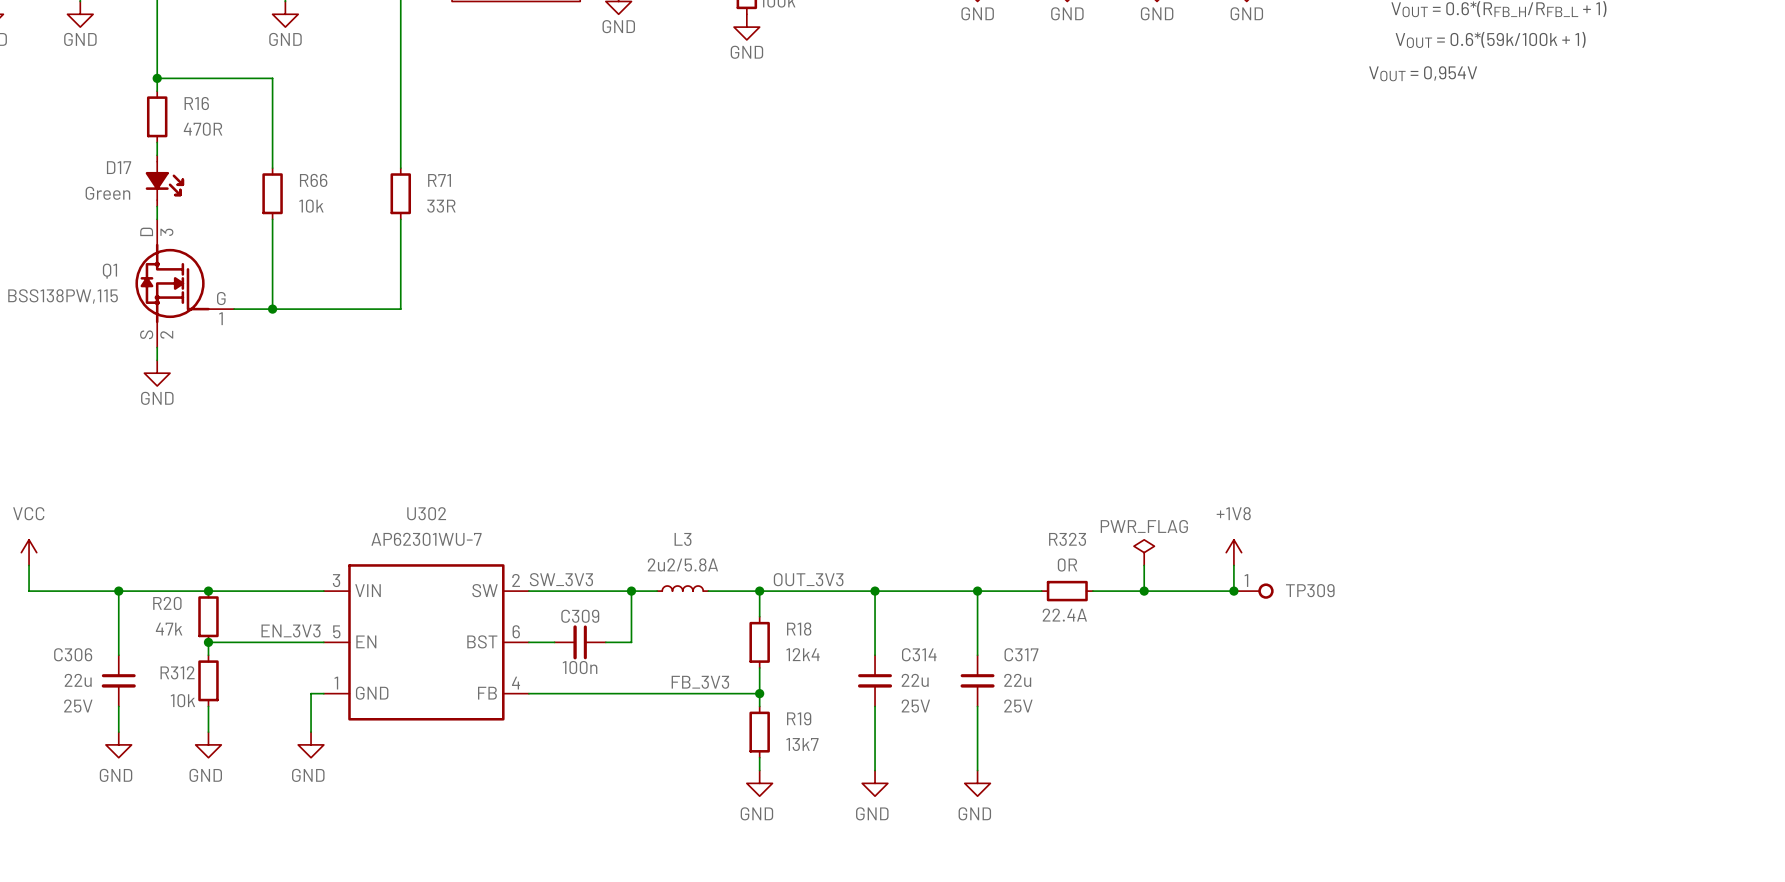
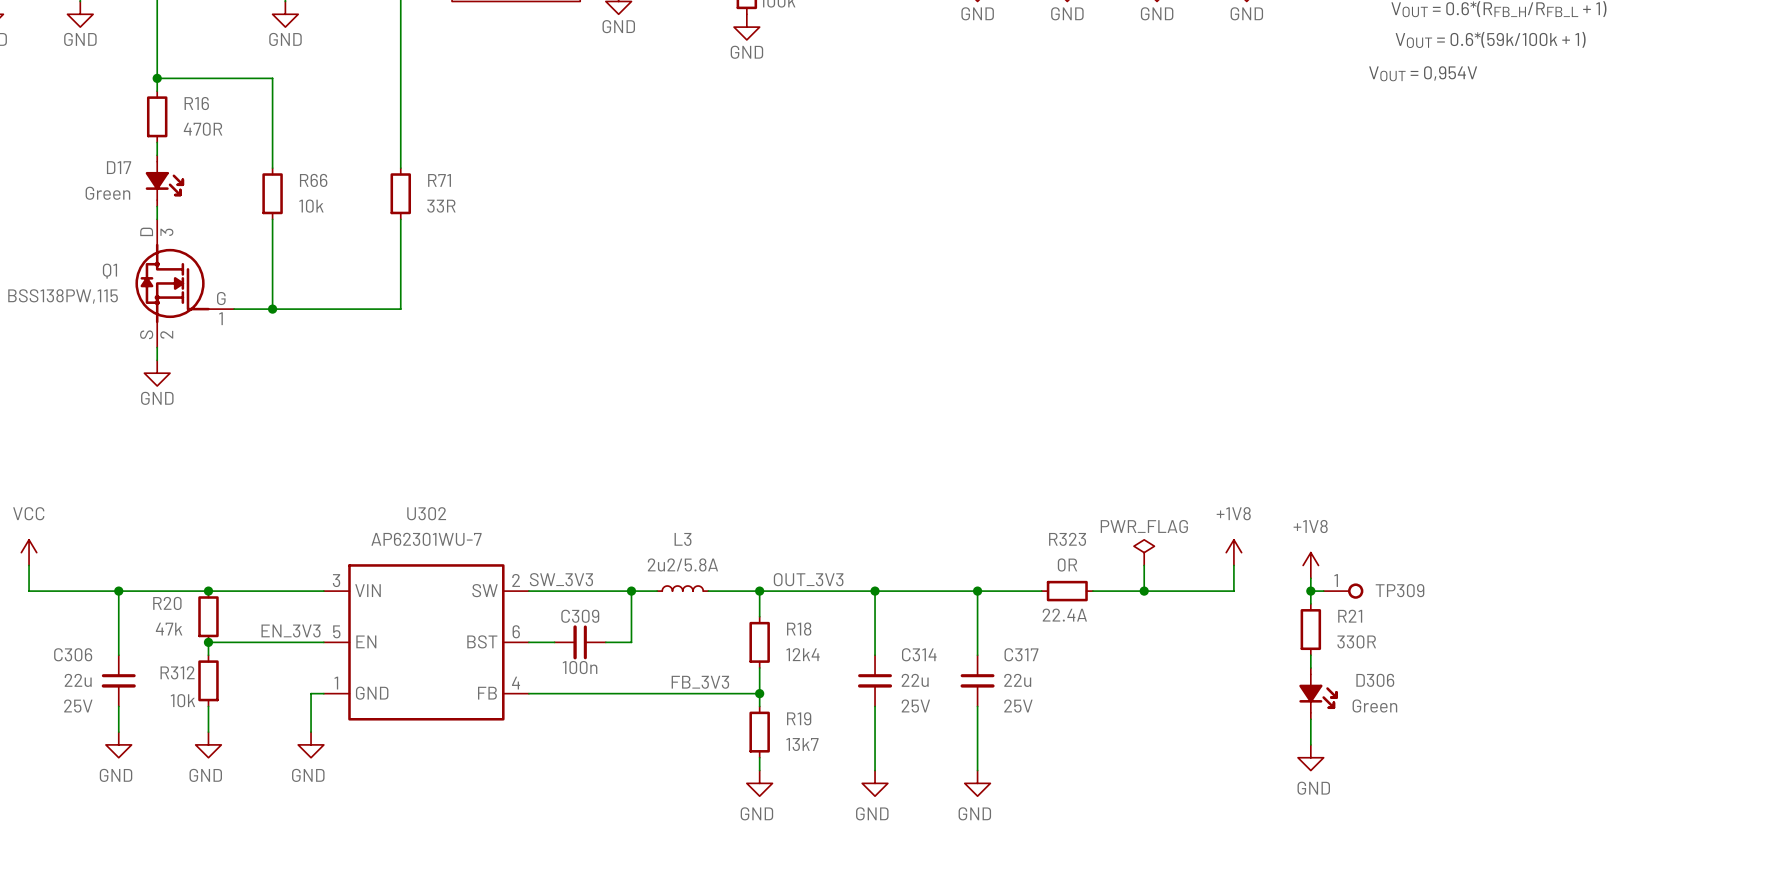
power symbol: none -> +1V8 (1310, 565)
wire: none -> (1310, 578) (1310, 603)
junction: (1233, 591) -> none
TP309 position: (1253, 591) -> (1343, 591)
wire: none -> (1310, 591) (1323, 591)
junction: none -> (1310, 591)
R21: none -> (1310, 629)
wire: none -> (1310, 655) (1310, 668)
D306: none -> (1318, 693)
wire: none -> (1310, 719) (1310, 744)
power symbol: none -> GND (1310, 757)

